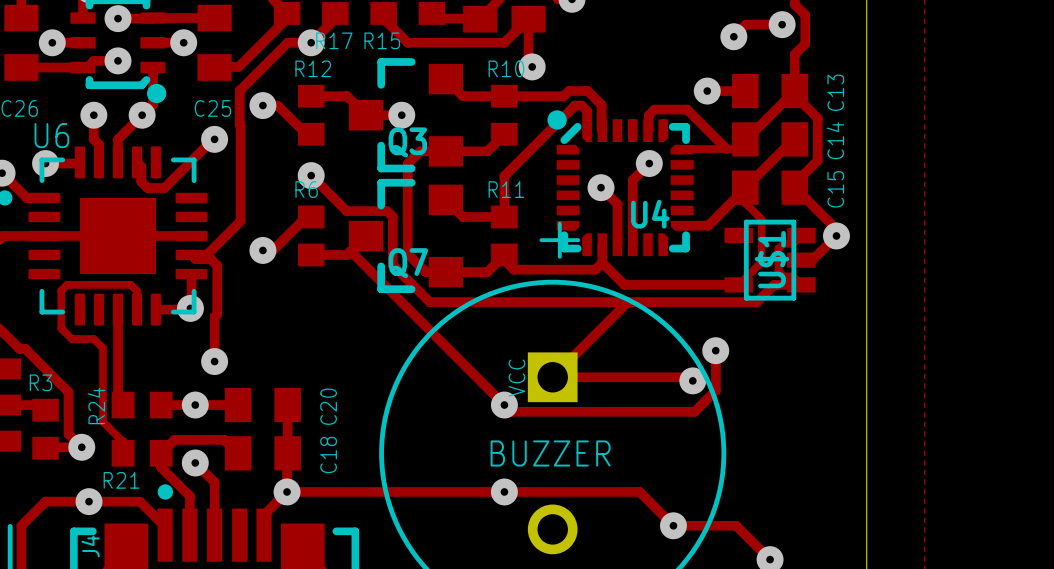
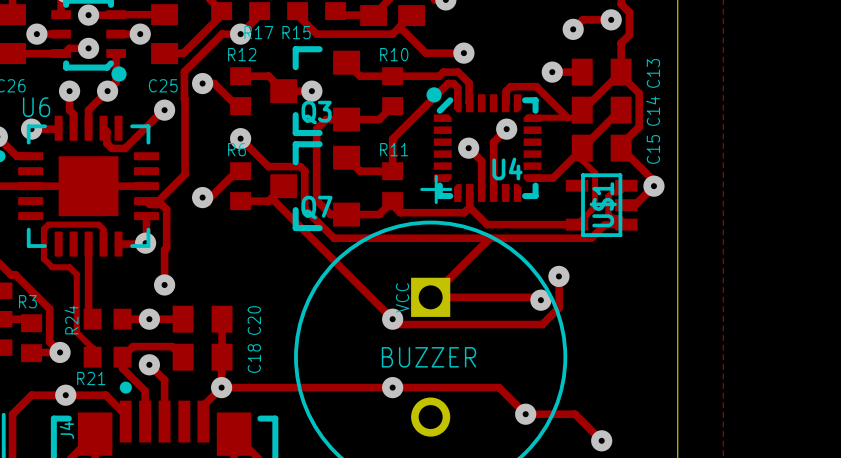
track: (528, 24) (528, 63) (532, 66) -> none
track: none -> (399, 26) (425, 53) (463, 53)
via position: (532, 66) -> (463, 53)

